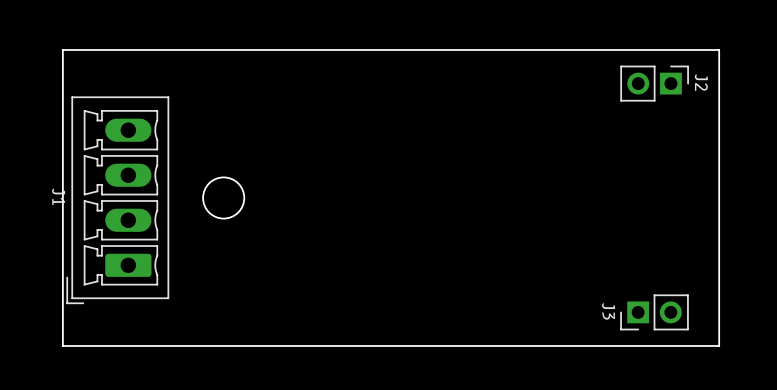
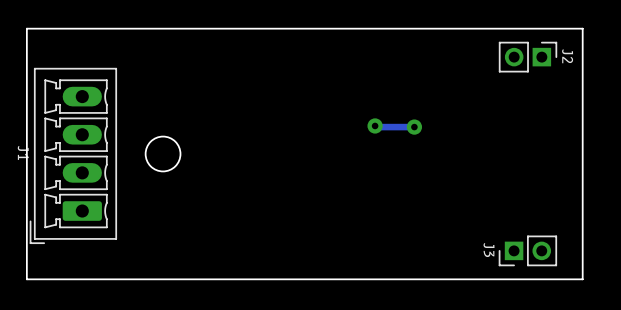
track: none -> (375, 125) (414, 127)
via: none -> (375, 125)
via: none -> (414, 127)

